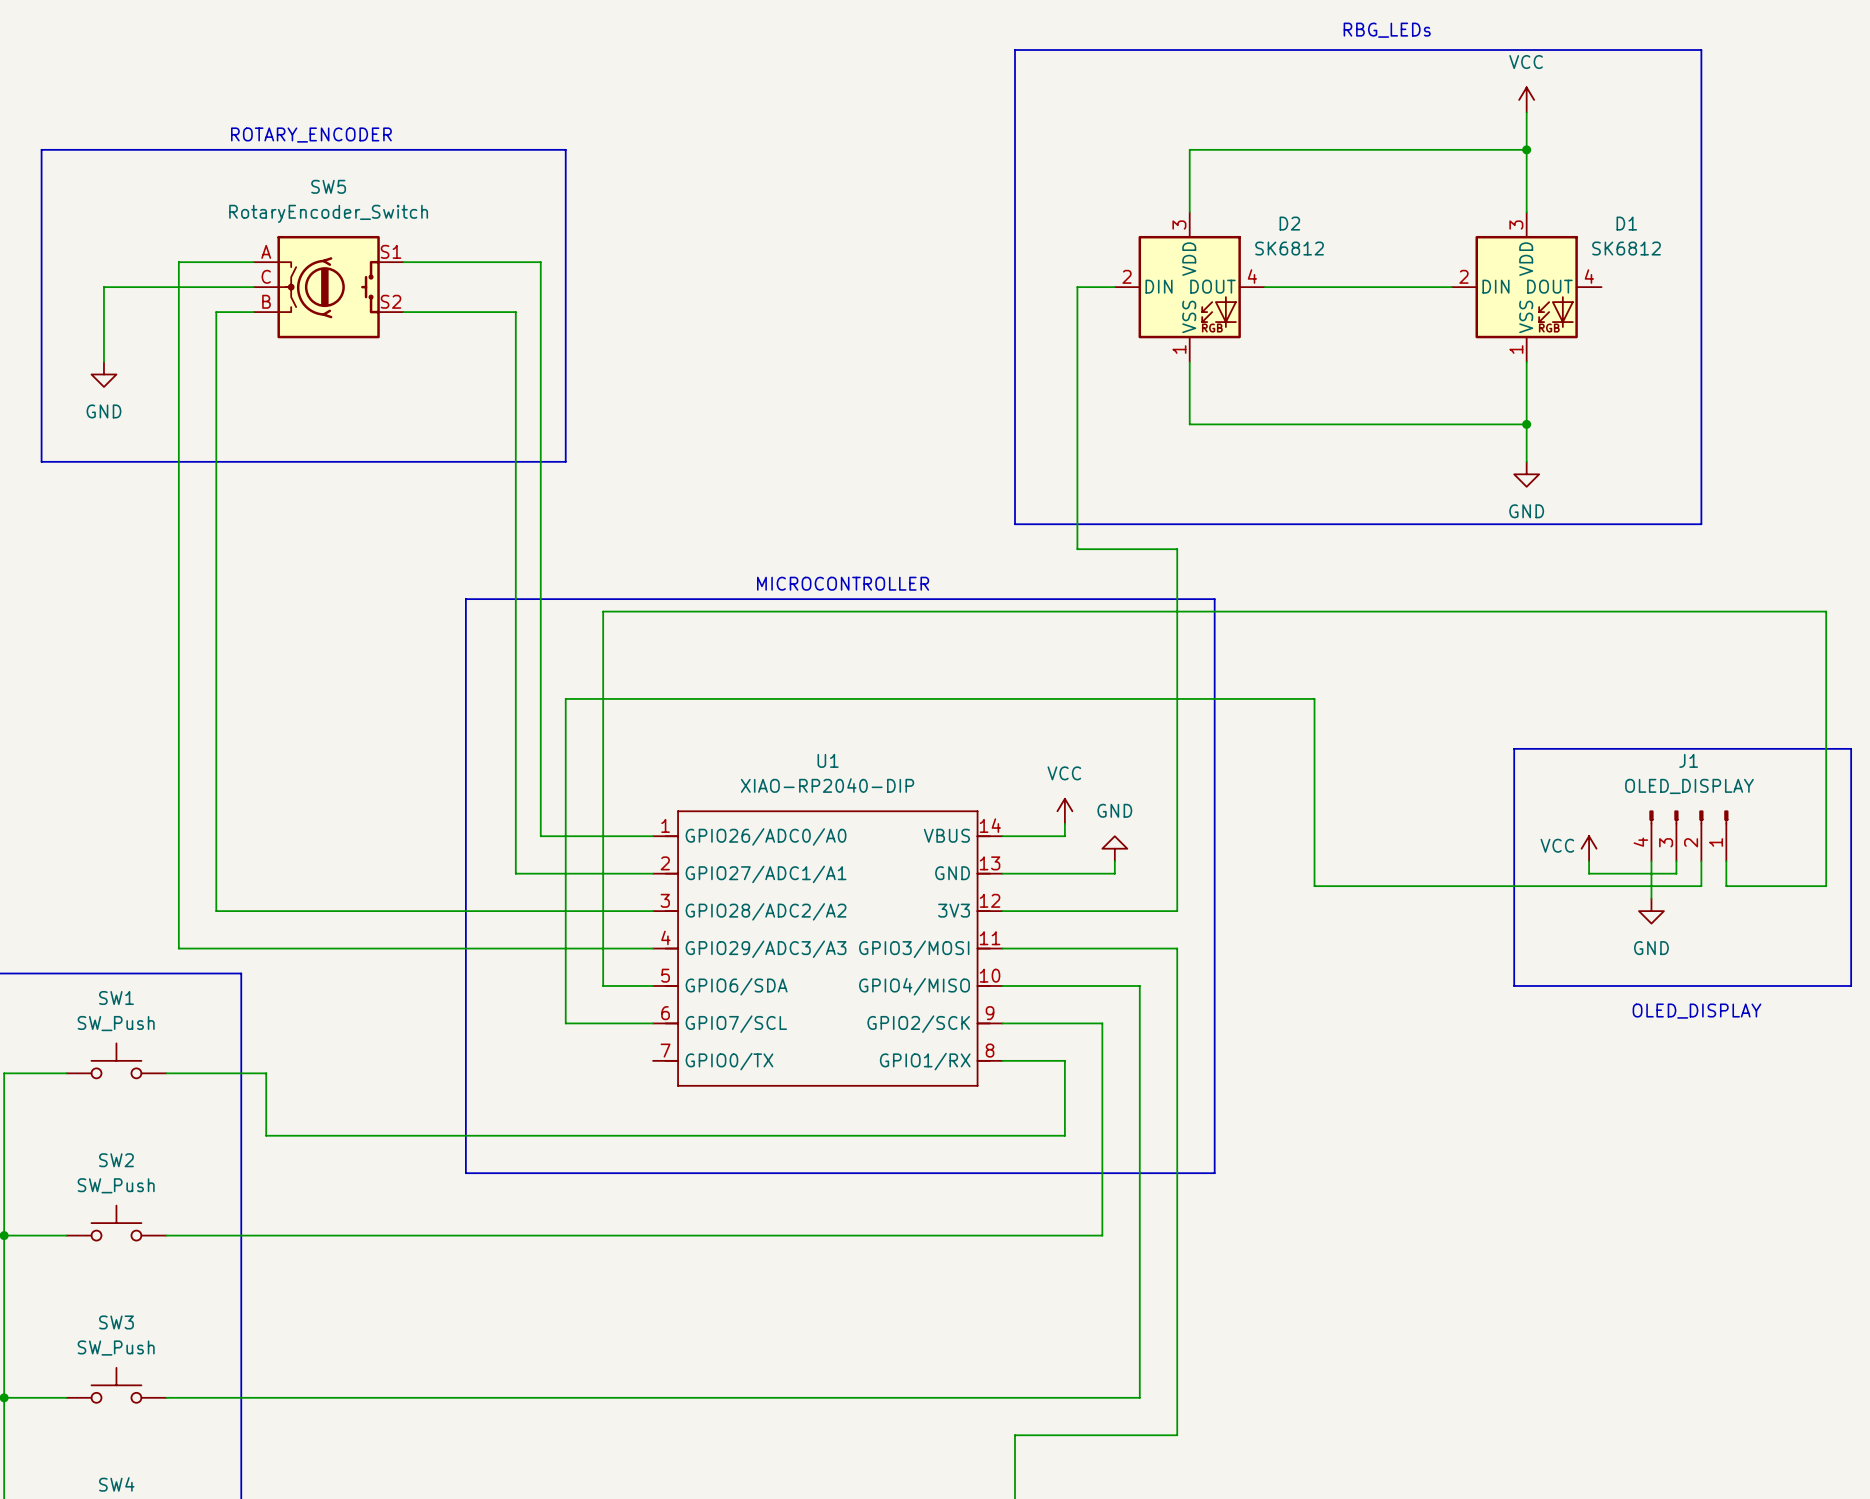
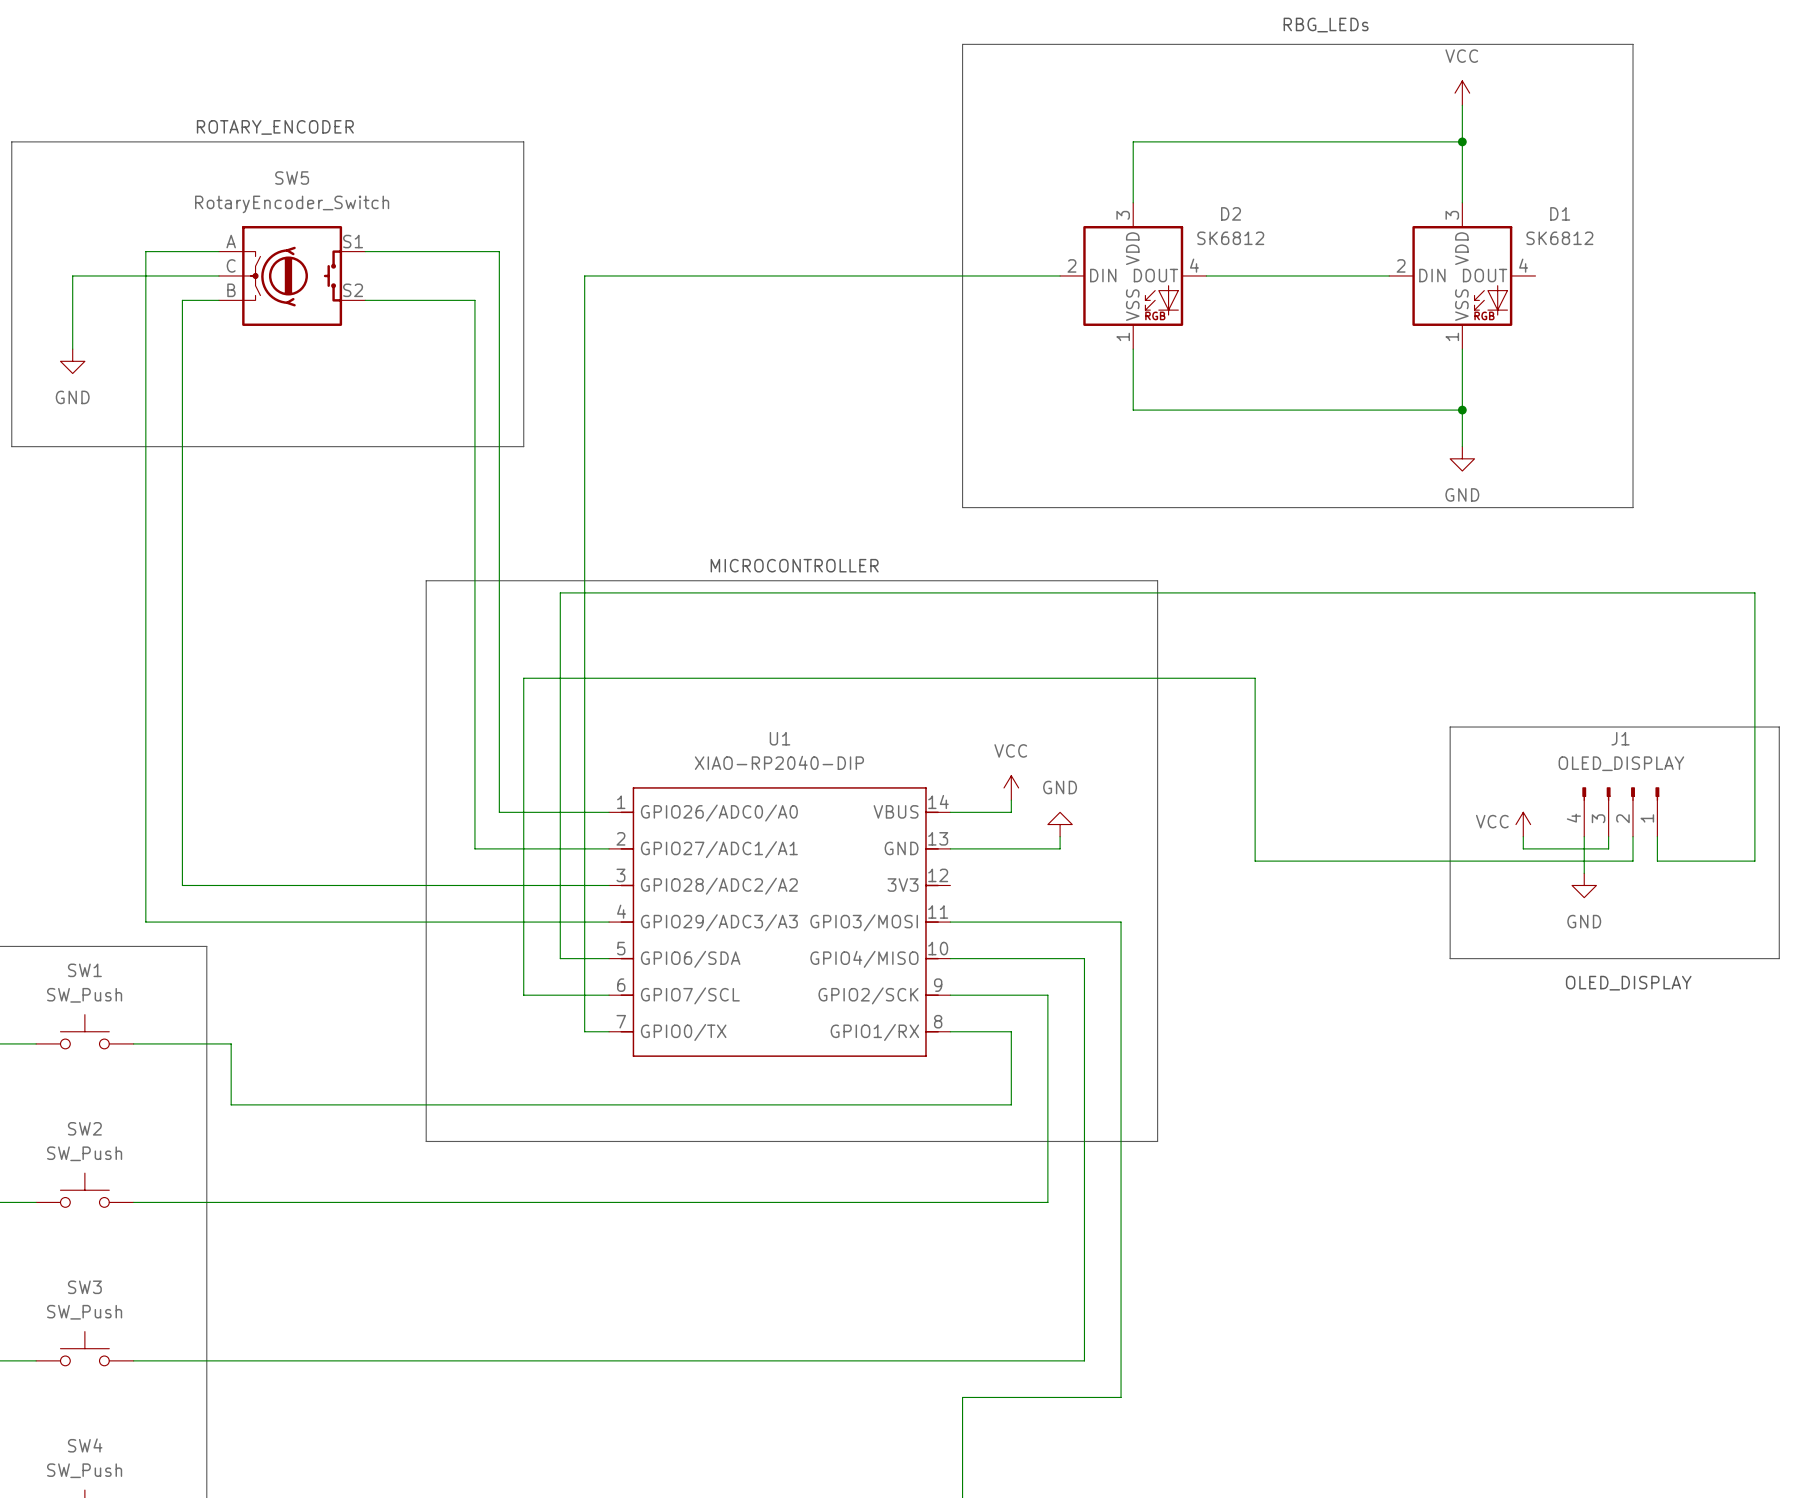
wire: (1077, 287) (1077, 549) (1177, 549) (1177, 911) (1002, 911) -> (1023, 275) (584, 275) (584, 1031) (609, 1031)

